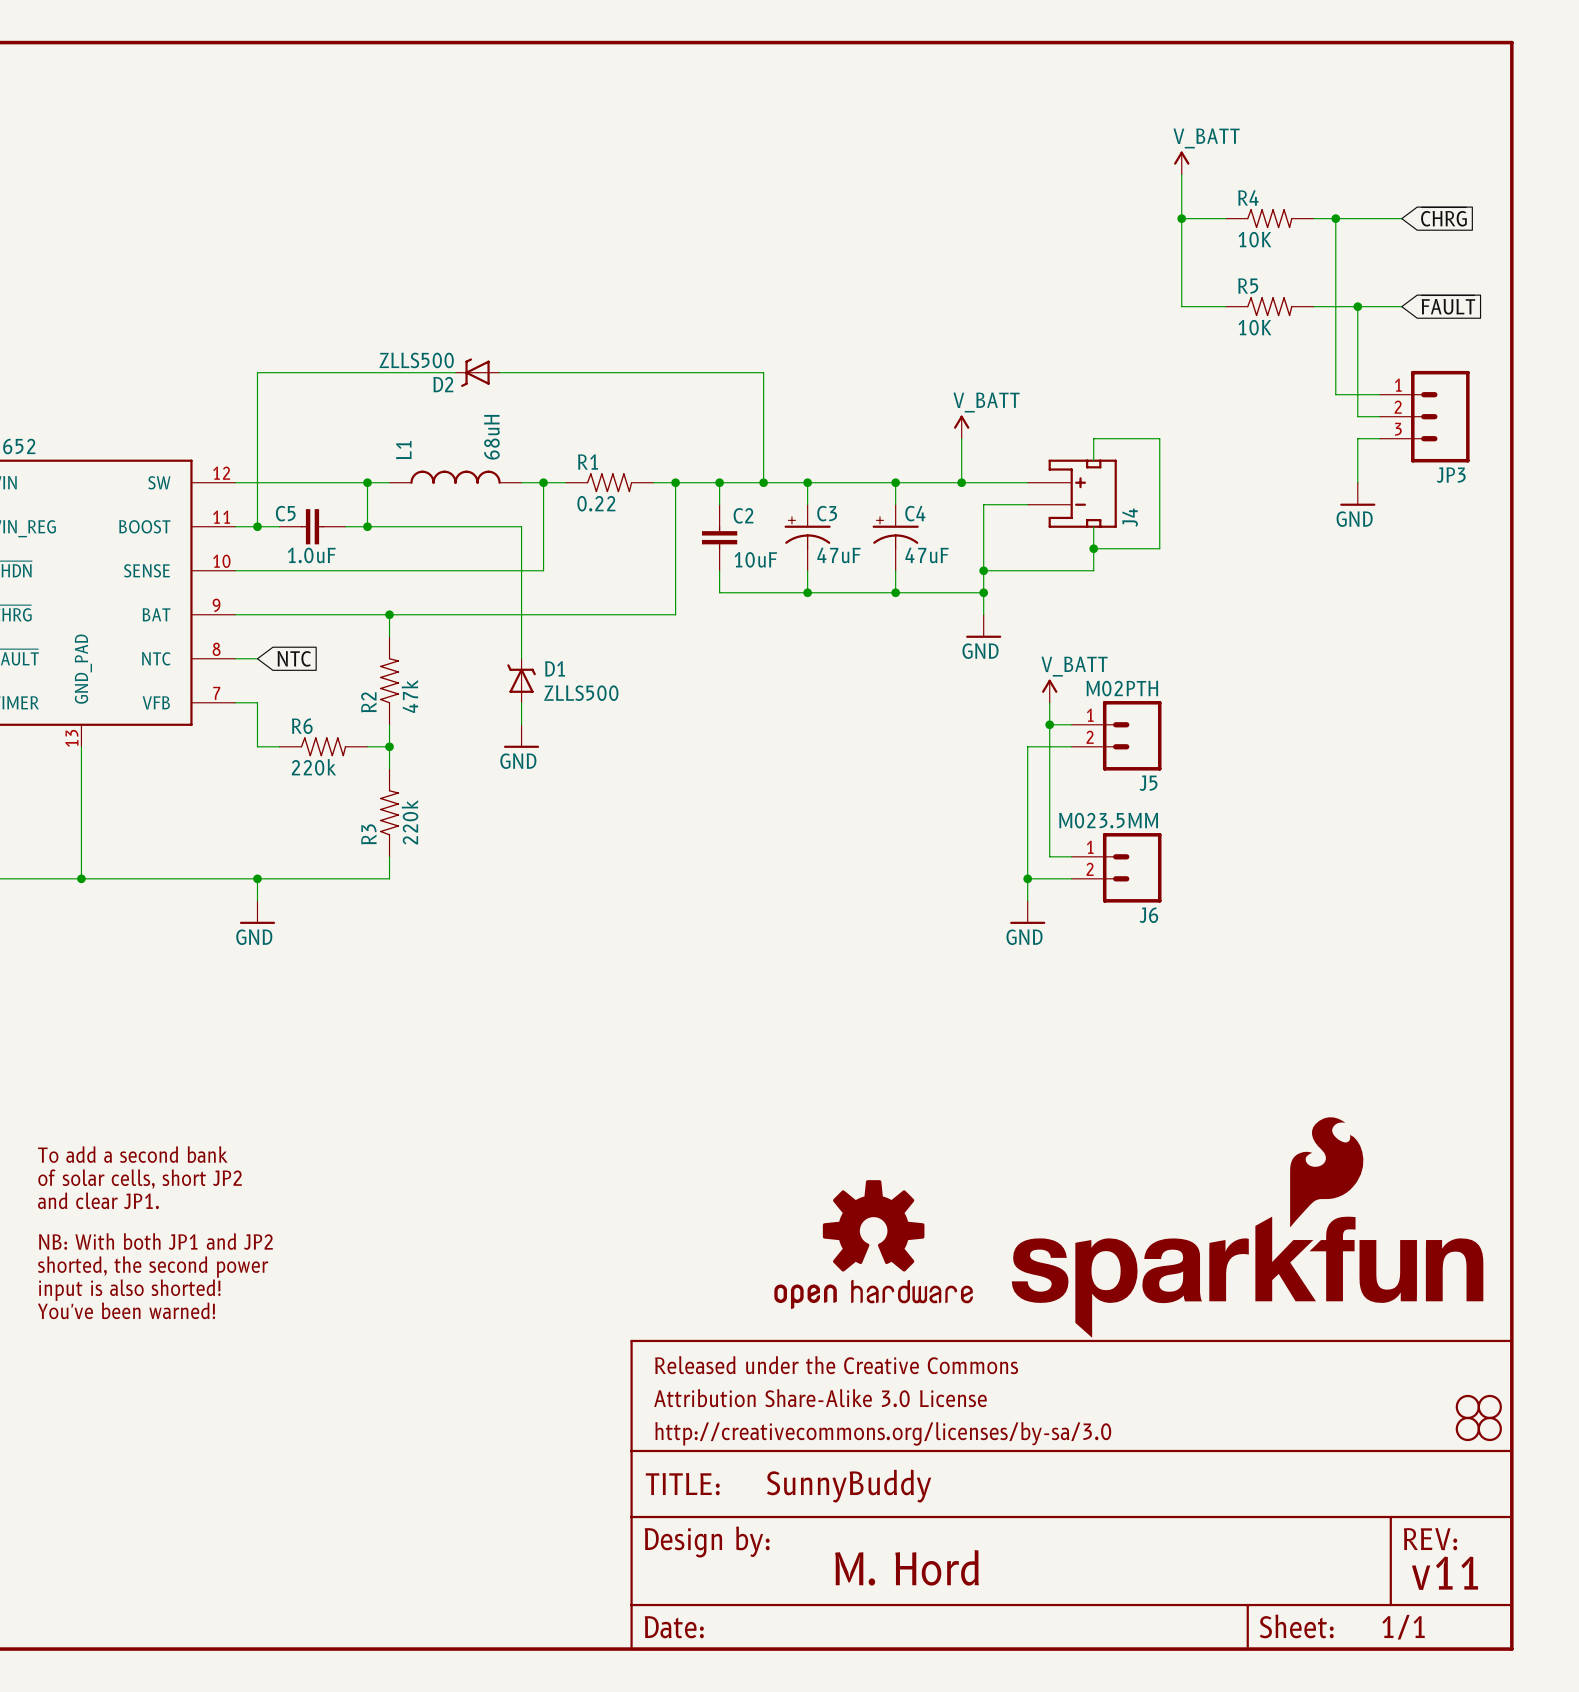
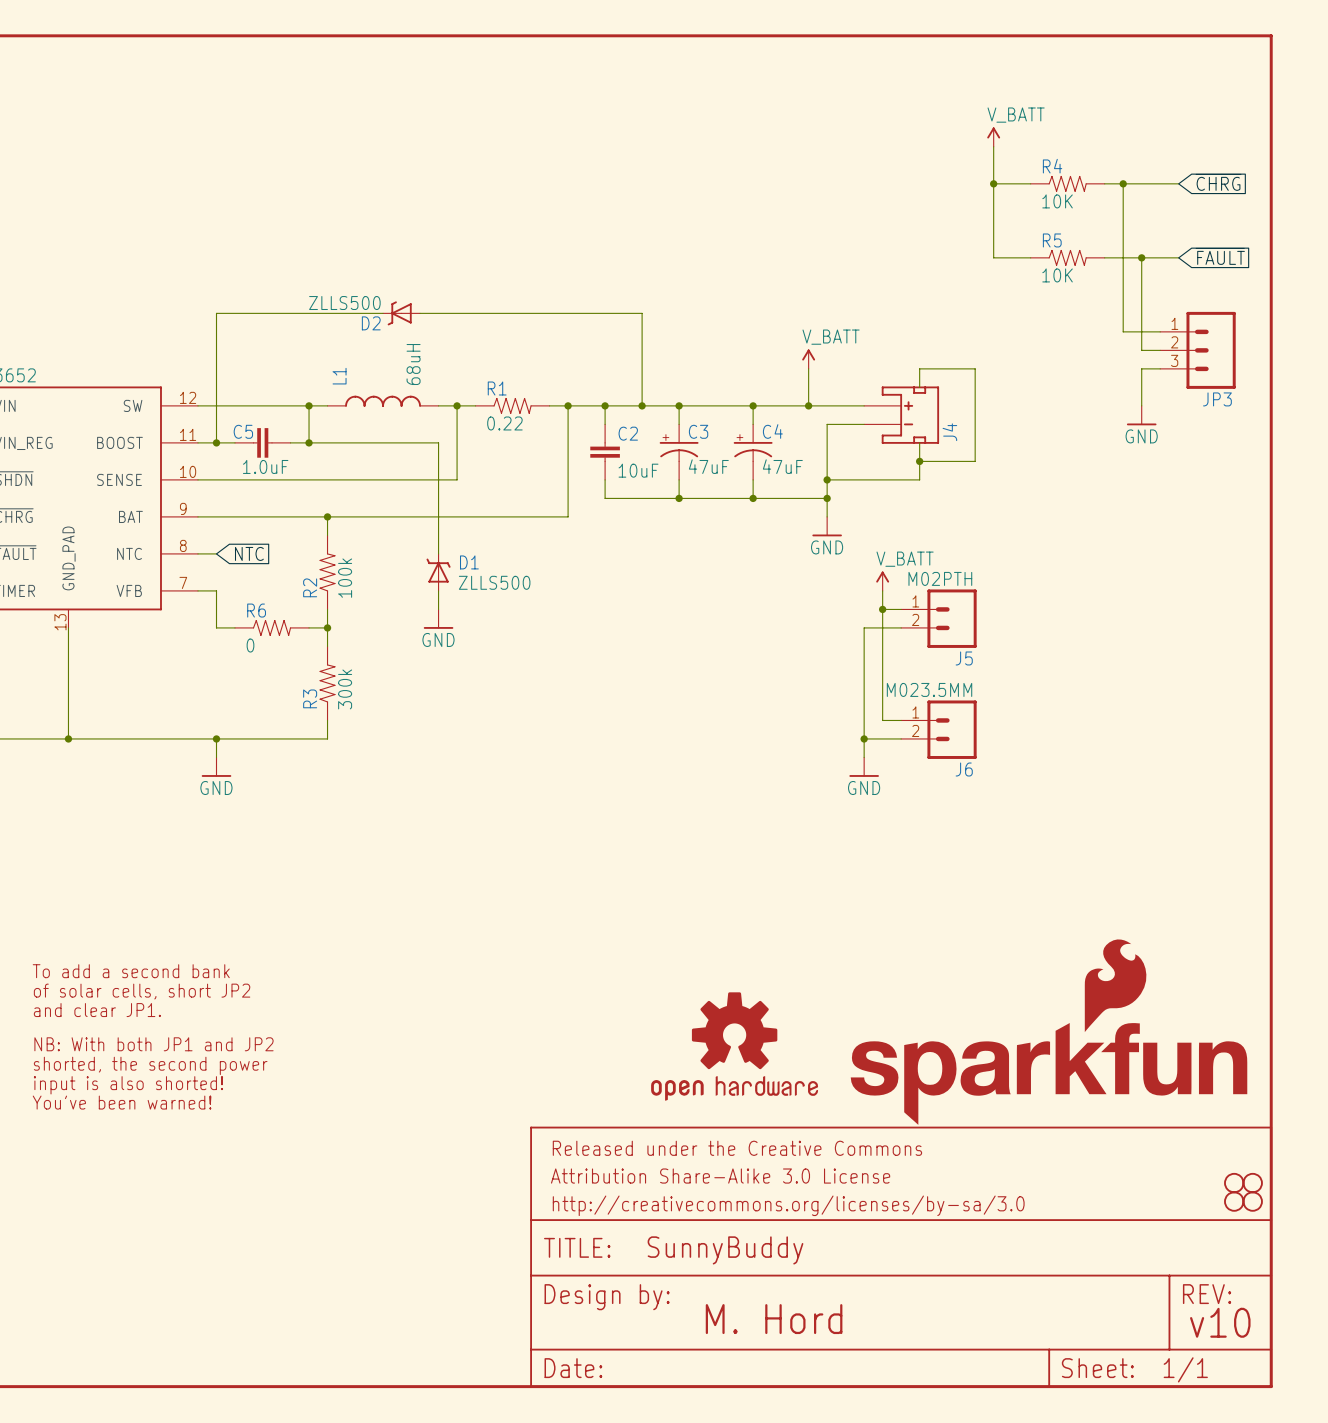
R2 value: 47k (409, 696) -> 100k (345, 578)
R6 value: 220k (313, 767) -> 0 (250, 645)
R3 value: 220k (410, 822) -> 300k (345, 689)
text: v11 (1445, 1573) -> v10 (1220, 1322)

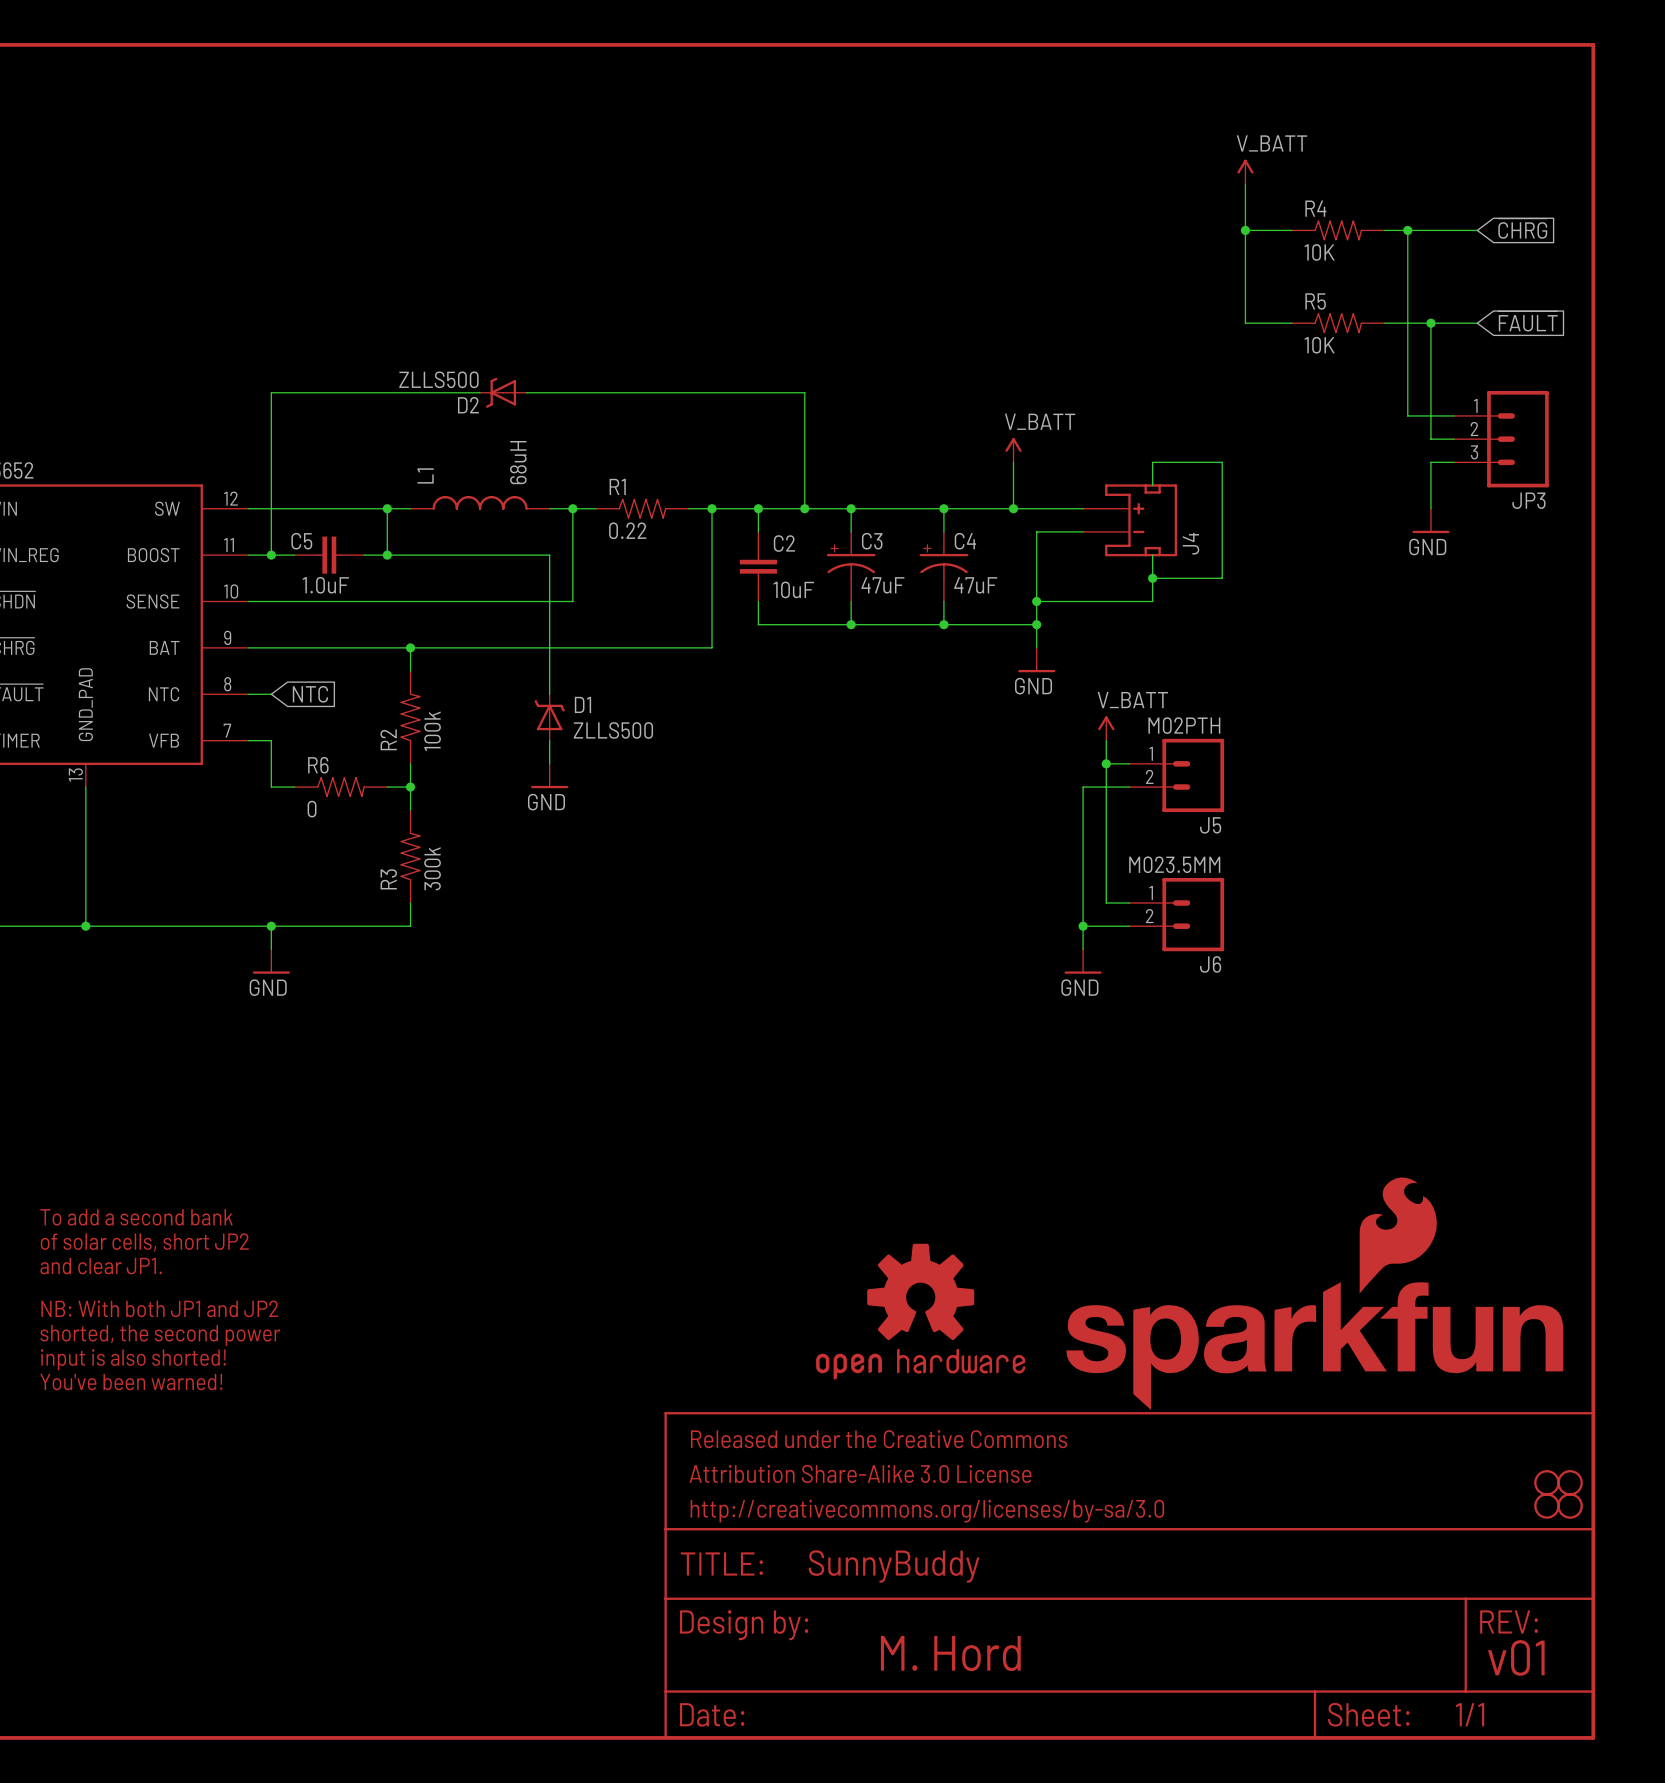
text: v10 (1220, 1322) -> v01 (1516, 1657)

